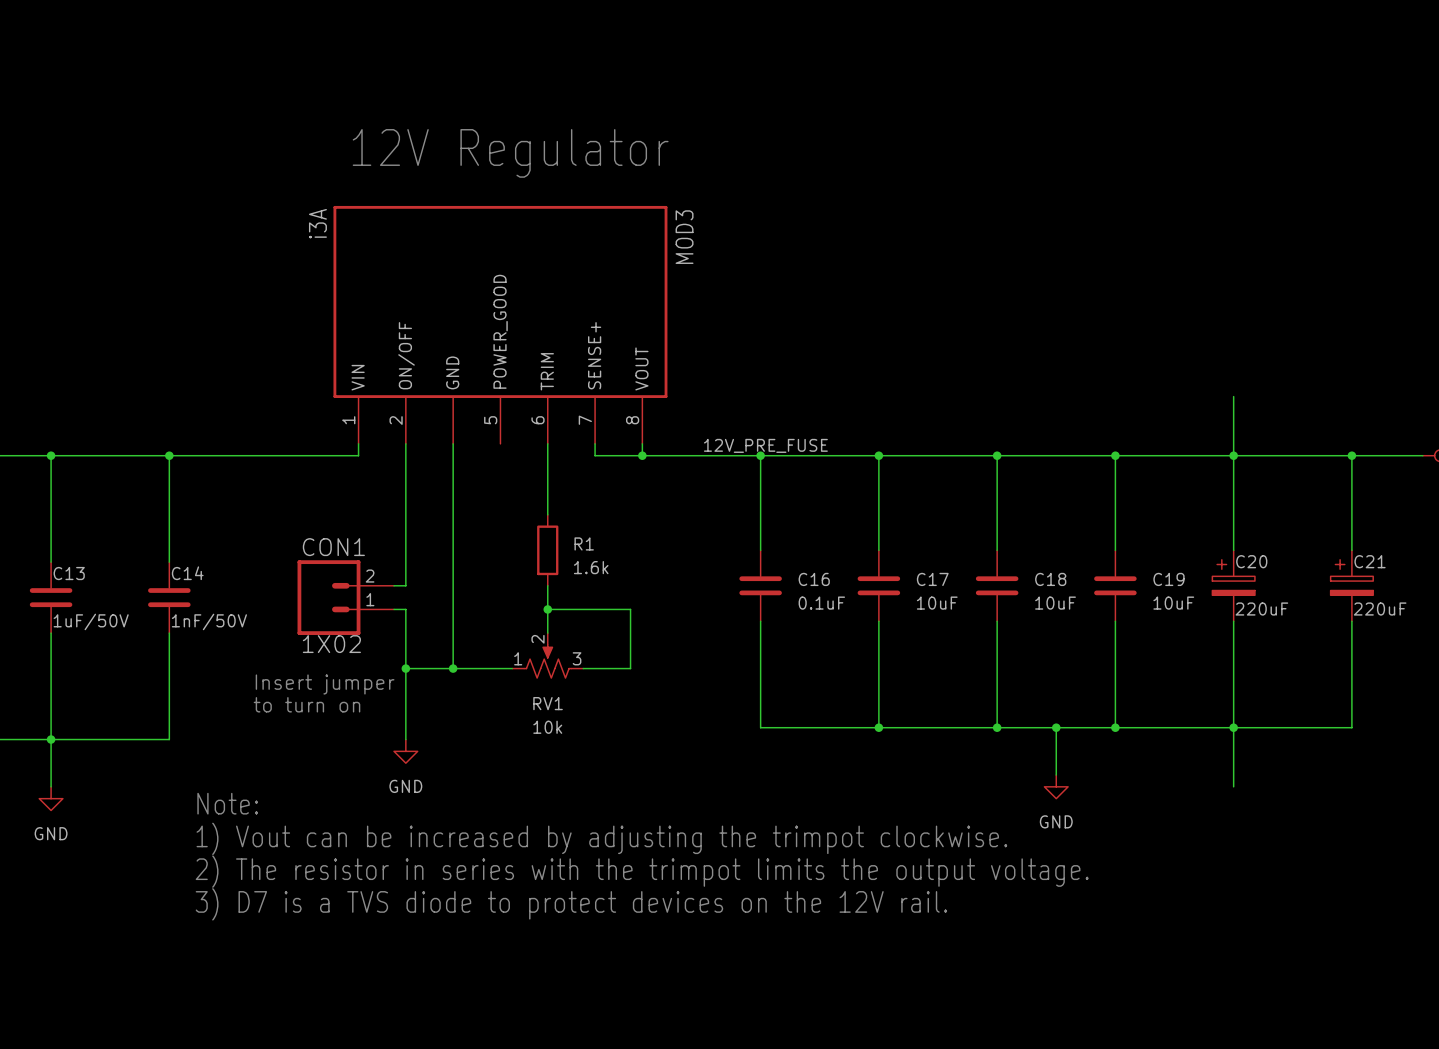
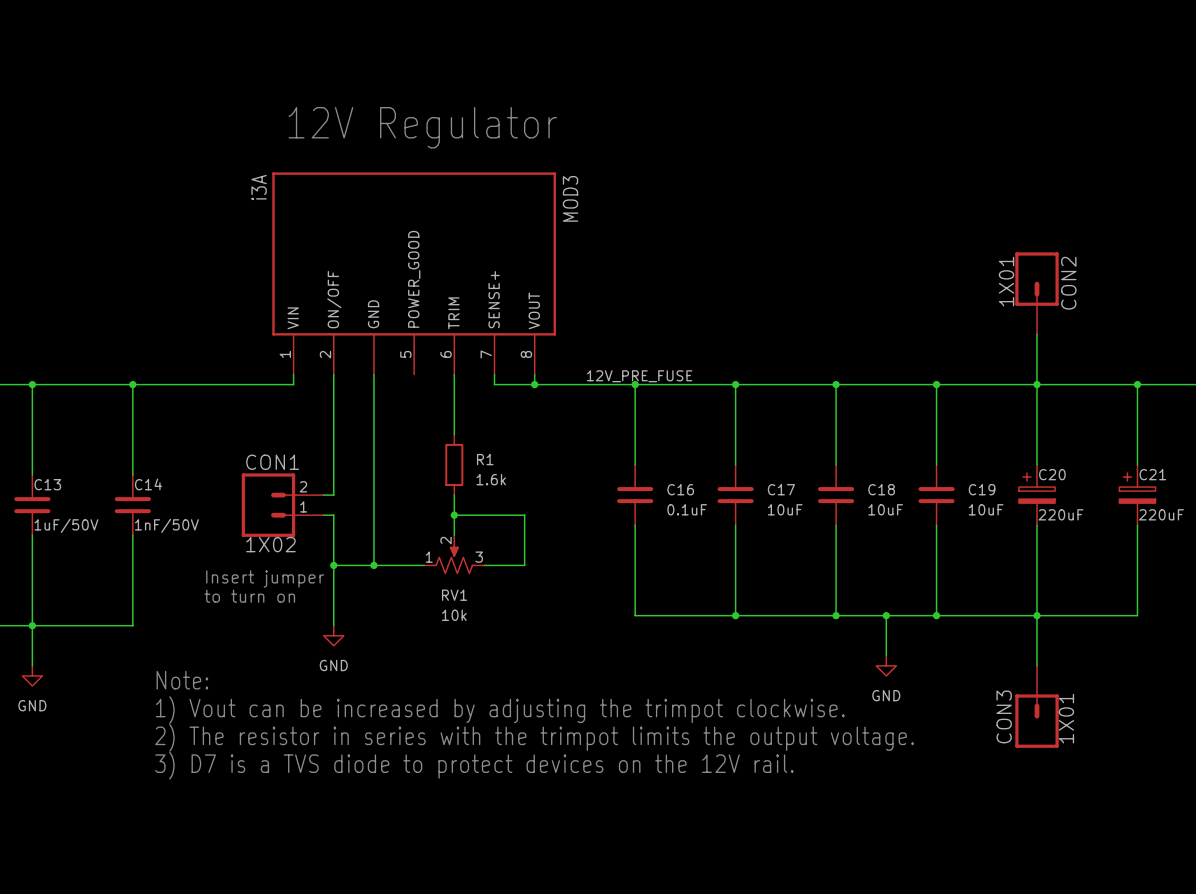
CON2: none -> 1X01 (1037, 293)
CON3: none -> 1X01 (1037, 706)

